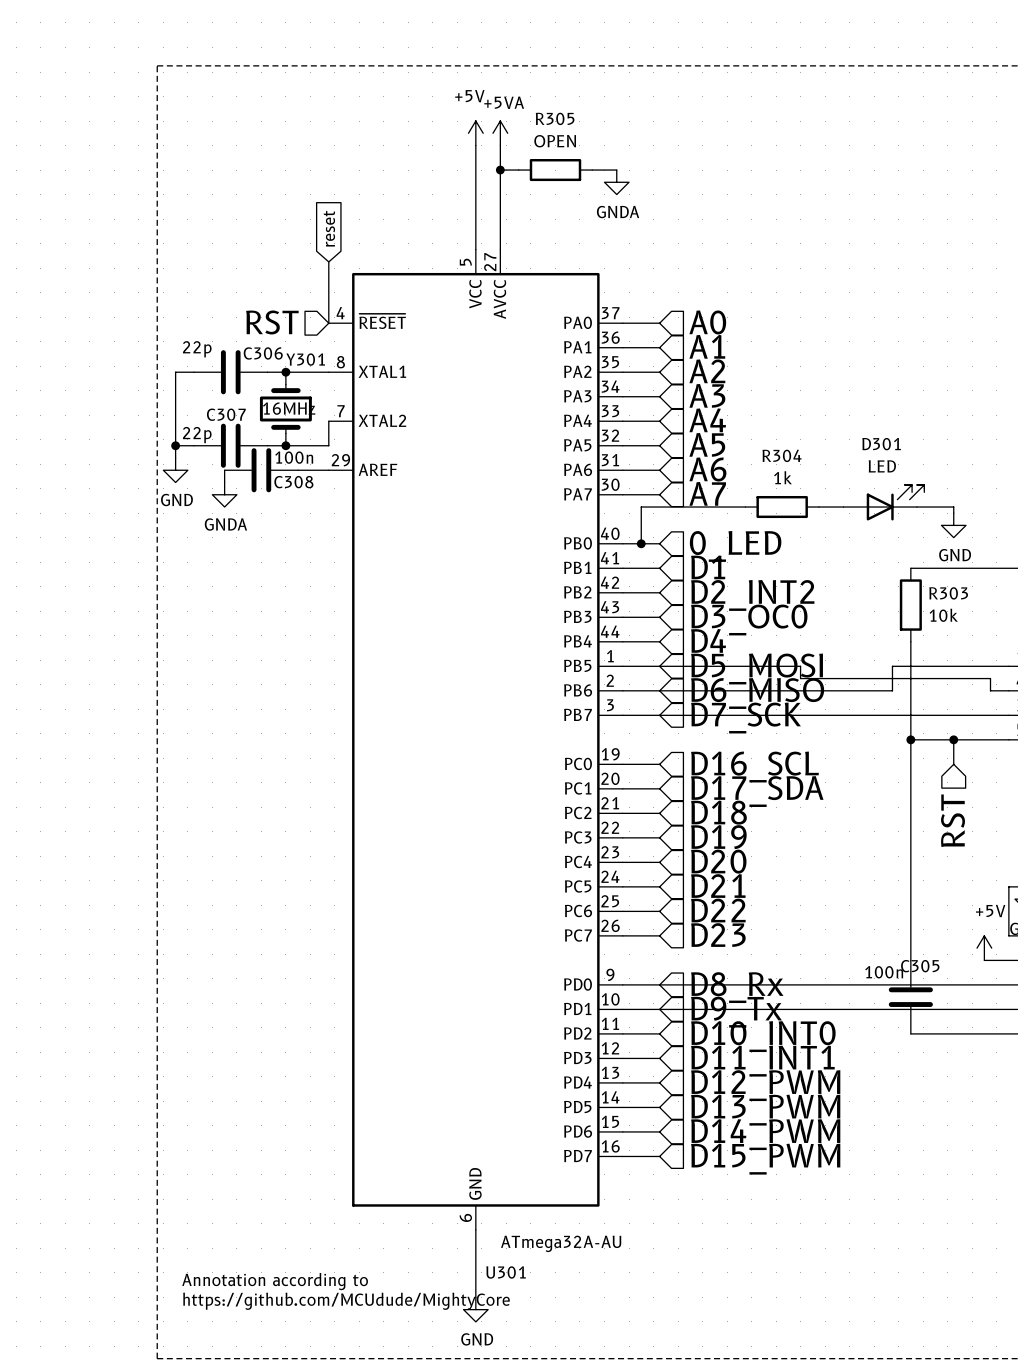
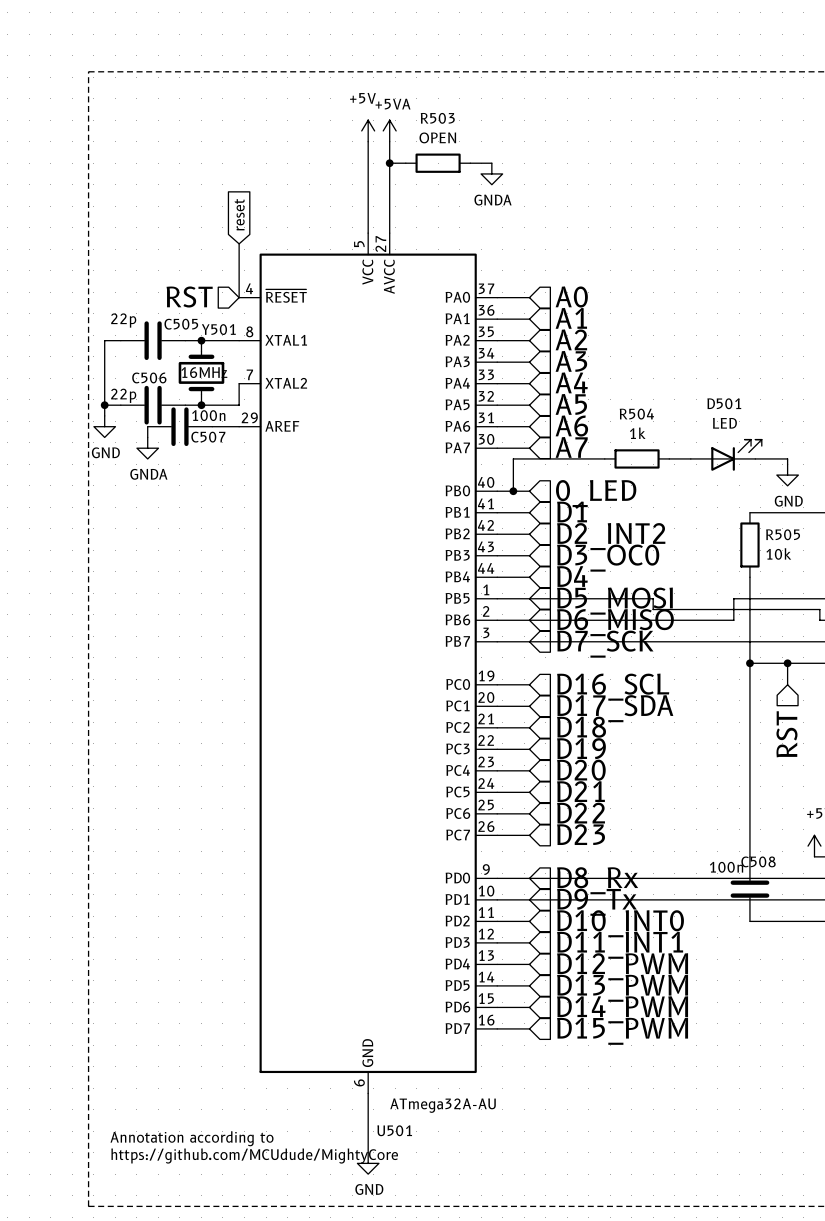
R305 name: R305 (555, 118) -> R503 (437, 118)
C306 name: C306 (263, 353) -> C505 (181, 324)
Y301 name: Y301 (305, 359) -> Y501 (218, 329)
C307 name: C307 (226, 414) -> C506 (149, 377)
D301 name: D301 (881, 444) -> D501 (724, 403)
R304 name: R304 (782, 455) -> R504 (636, 414)
C308 name: C308 (293, 482) -> C507 (208, 437)
R303 name: R303 (948, 593) -> R505 (783, 534)
C305 name: C305 (920, 966) -> C508 (758, 861)
U301 name: U301 (506, 1272) -> U501 (394, 1130)

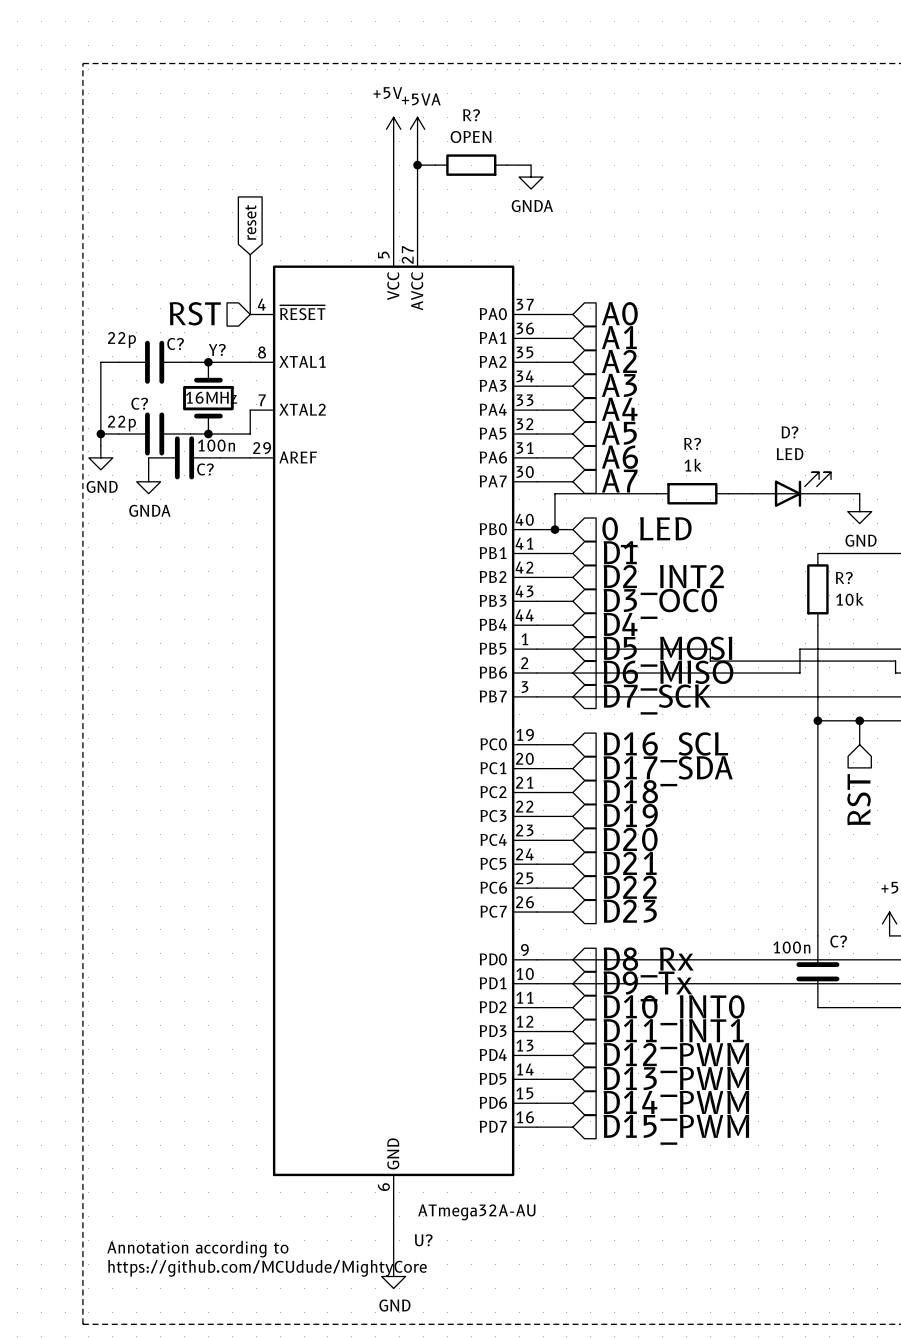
R503 name: R503 (437, 118) -> R? (471, 115)
C505 name: C505 (181, 324) -> C? (175, 344)
Y501 name: Y501 (218, 329) -> Y? (217, 349)
C506 name: C506 (149, 377) -> C? (139, 403)
D501 name: D501 (724, 403) -> D? (789, 432)
R504 name: R504 (636, 414) -> R? (692, 443)
C507 name: C507 (208, 437) -> C? (205, 469)
R505 name: R505 (783, 534) -> R? (844, 577)
C508 name: C508 (758, 861) -> C? (838, 941)
U501 name: U501 (394, 1130) -> U? (423, 1240)

